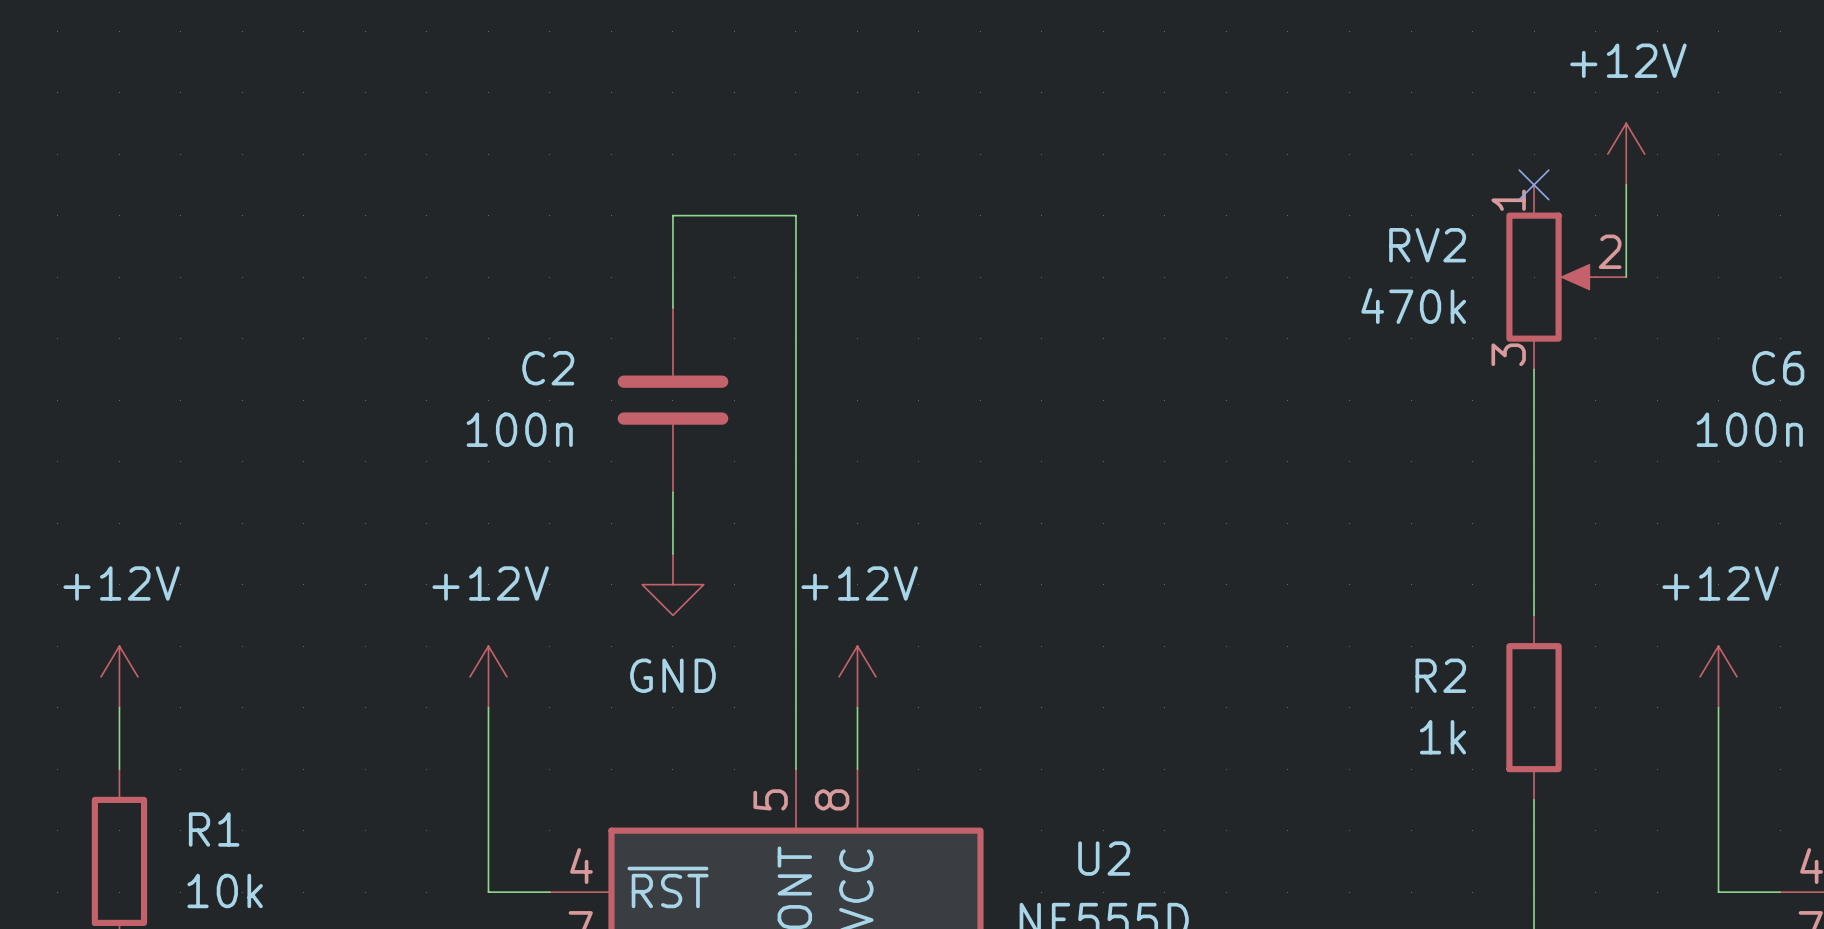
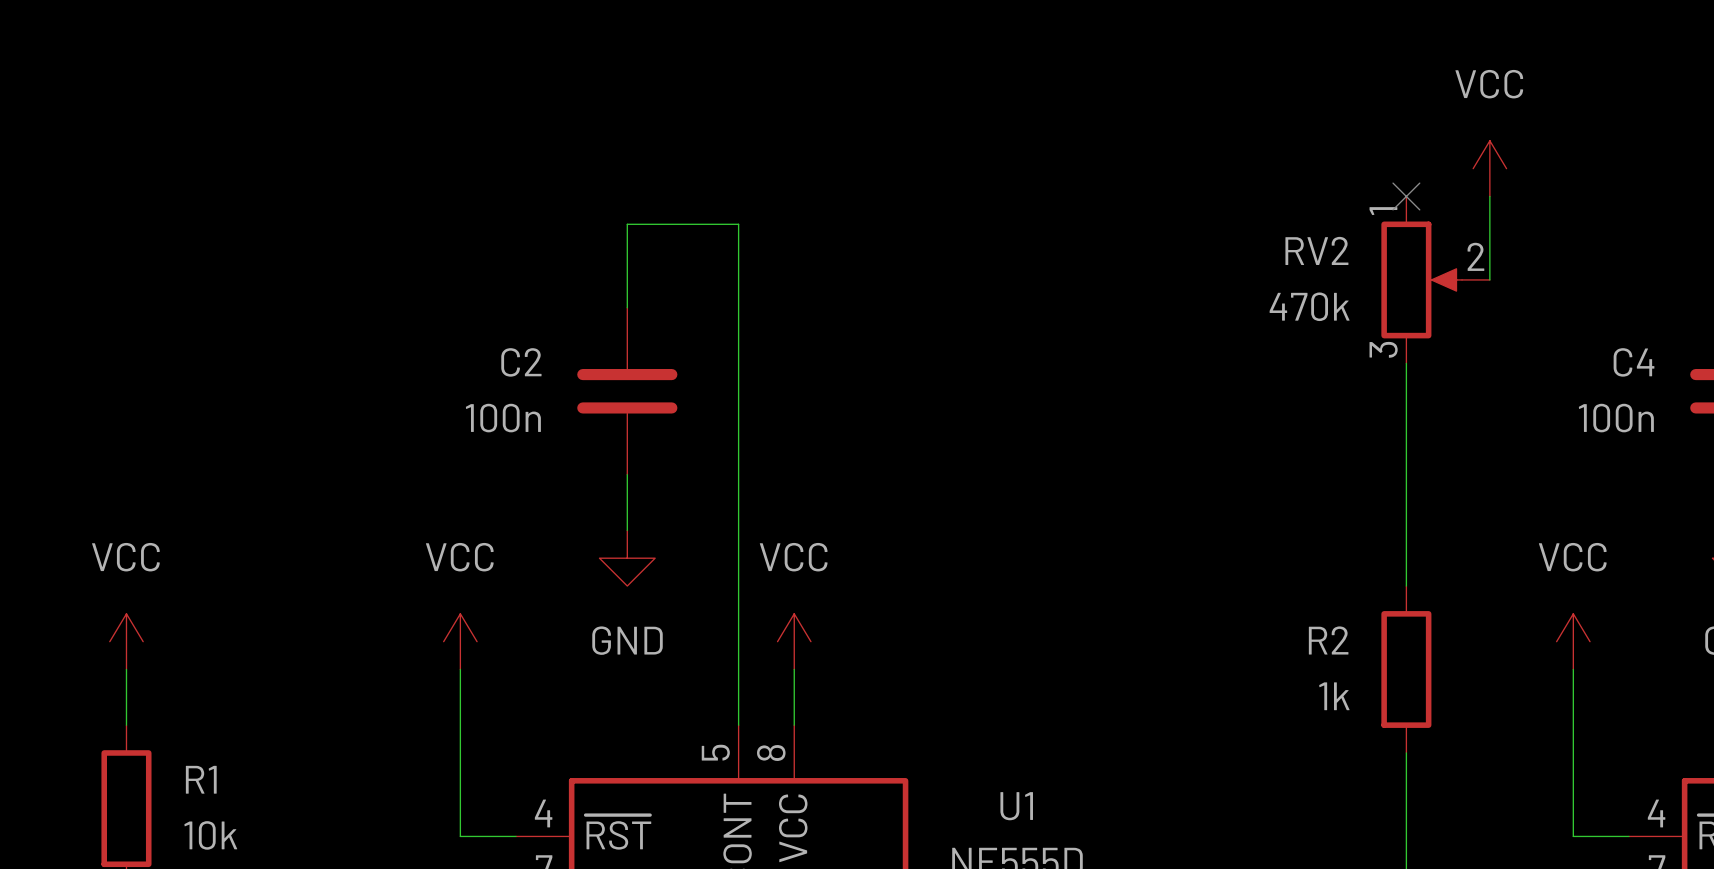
power symbol: +12V (1626, 154) -> VCC (1489, 168)
C6 name: C6 (1778, 368) -> C4 (1634, 362)
power symbol: +12V (119, 676) -> VCC (126, 641)
power symbol: +12V (488, 676) -> VCC (460, 641)
power symbol: +12V (857, 676) -> VCC (794, 641)
power symbol: +12V (1718, 676) -> VCC (1573, 641)
U2 name: U2 (1104, 858) -> U1 (1016, 806)

